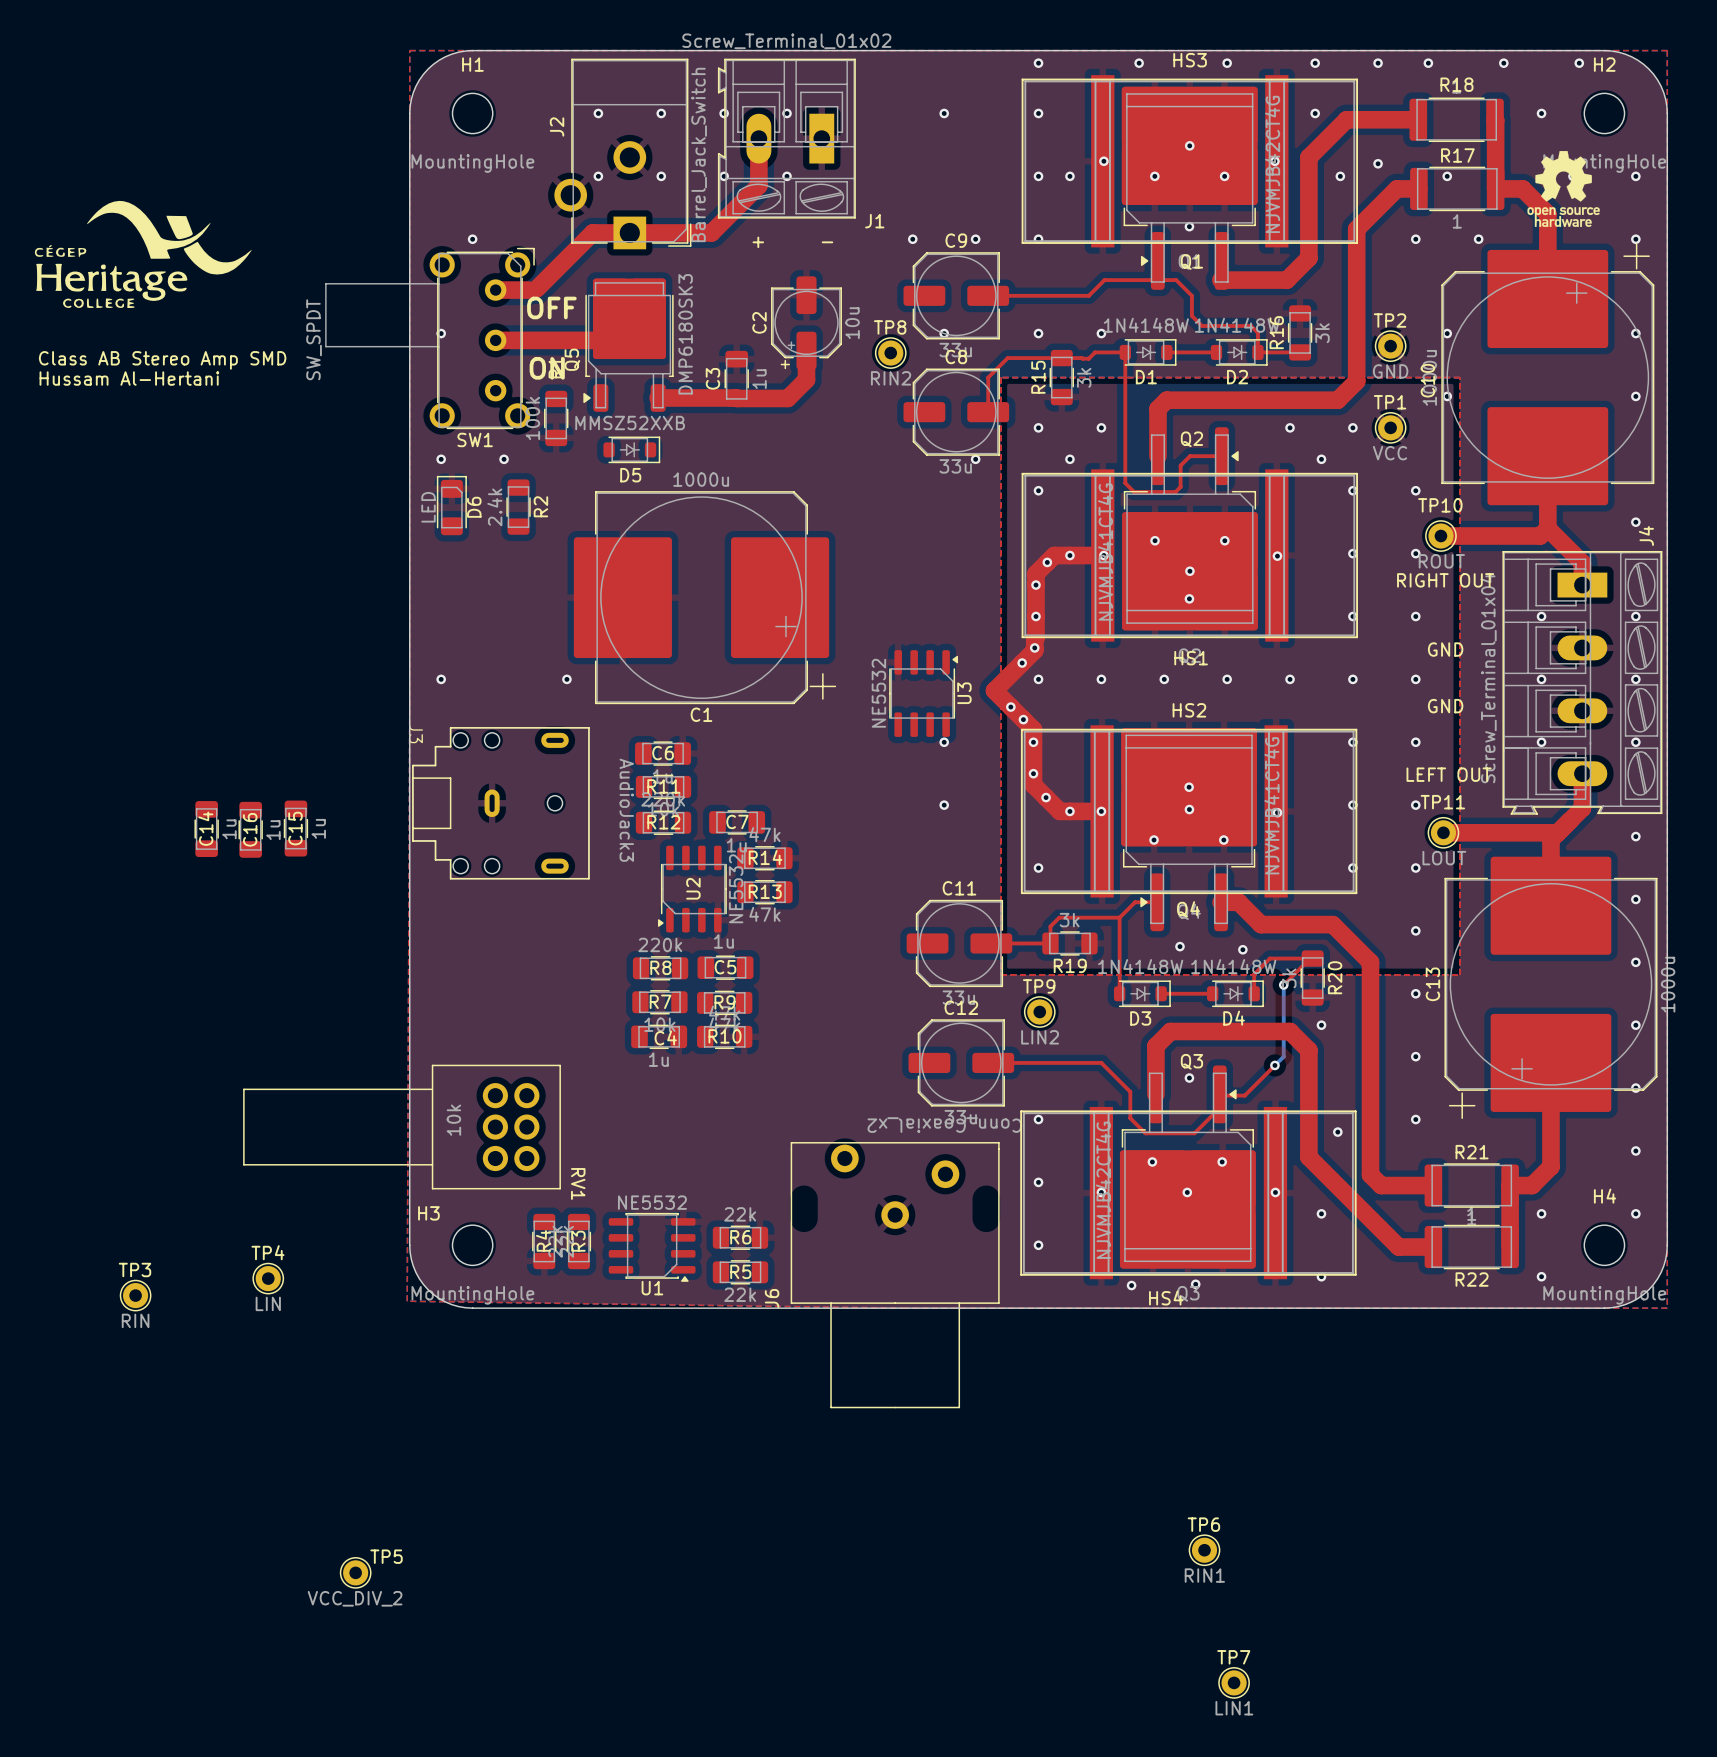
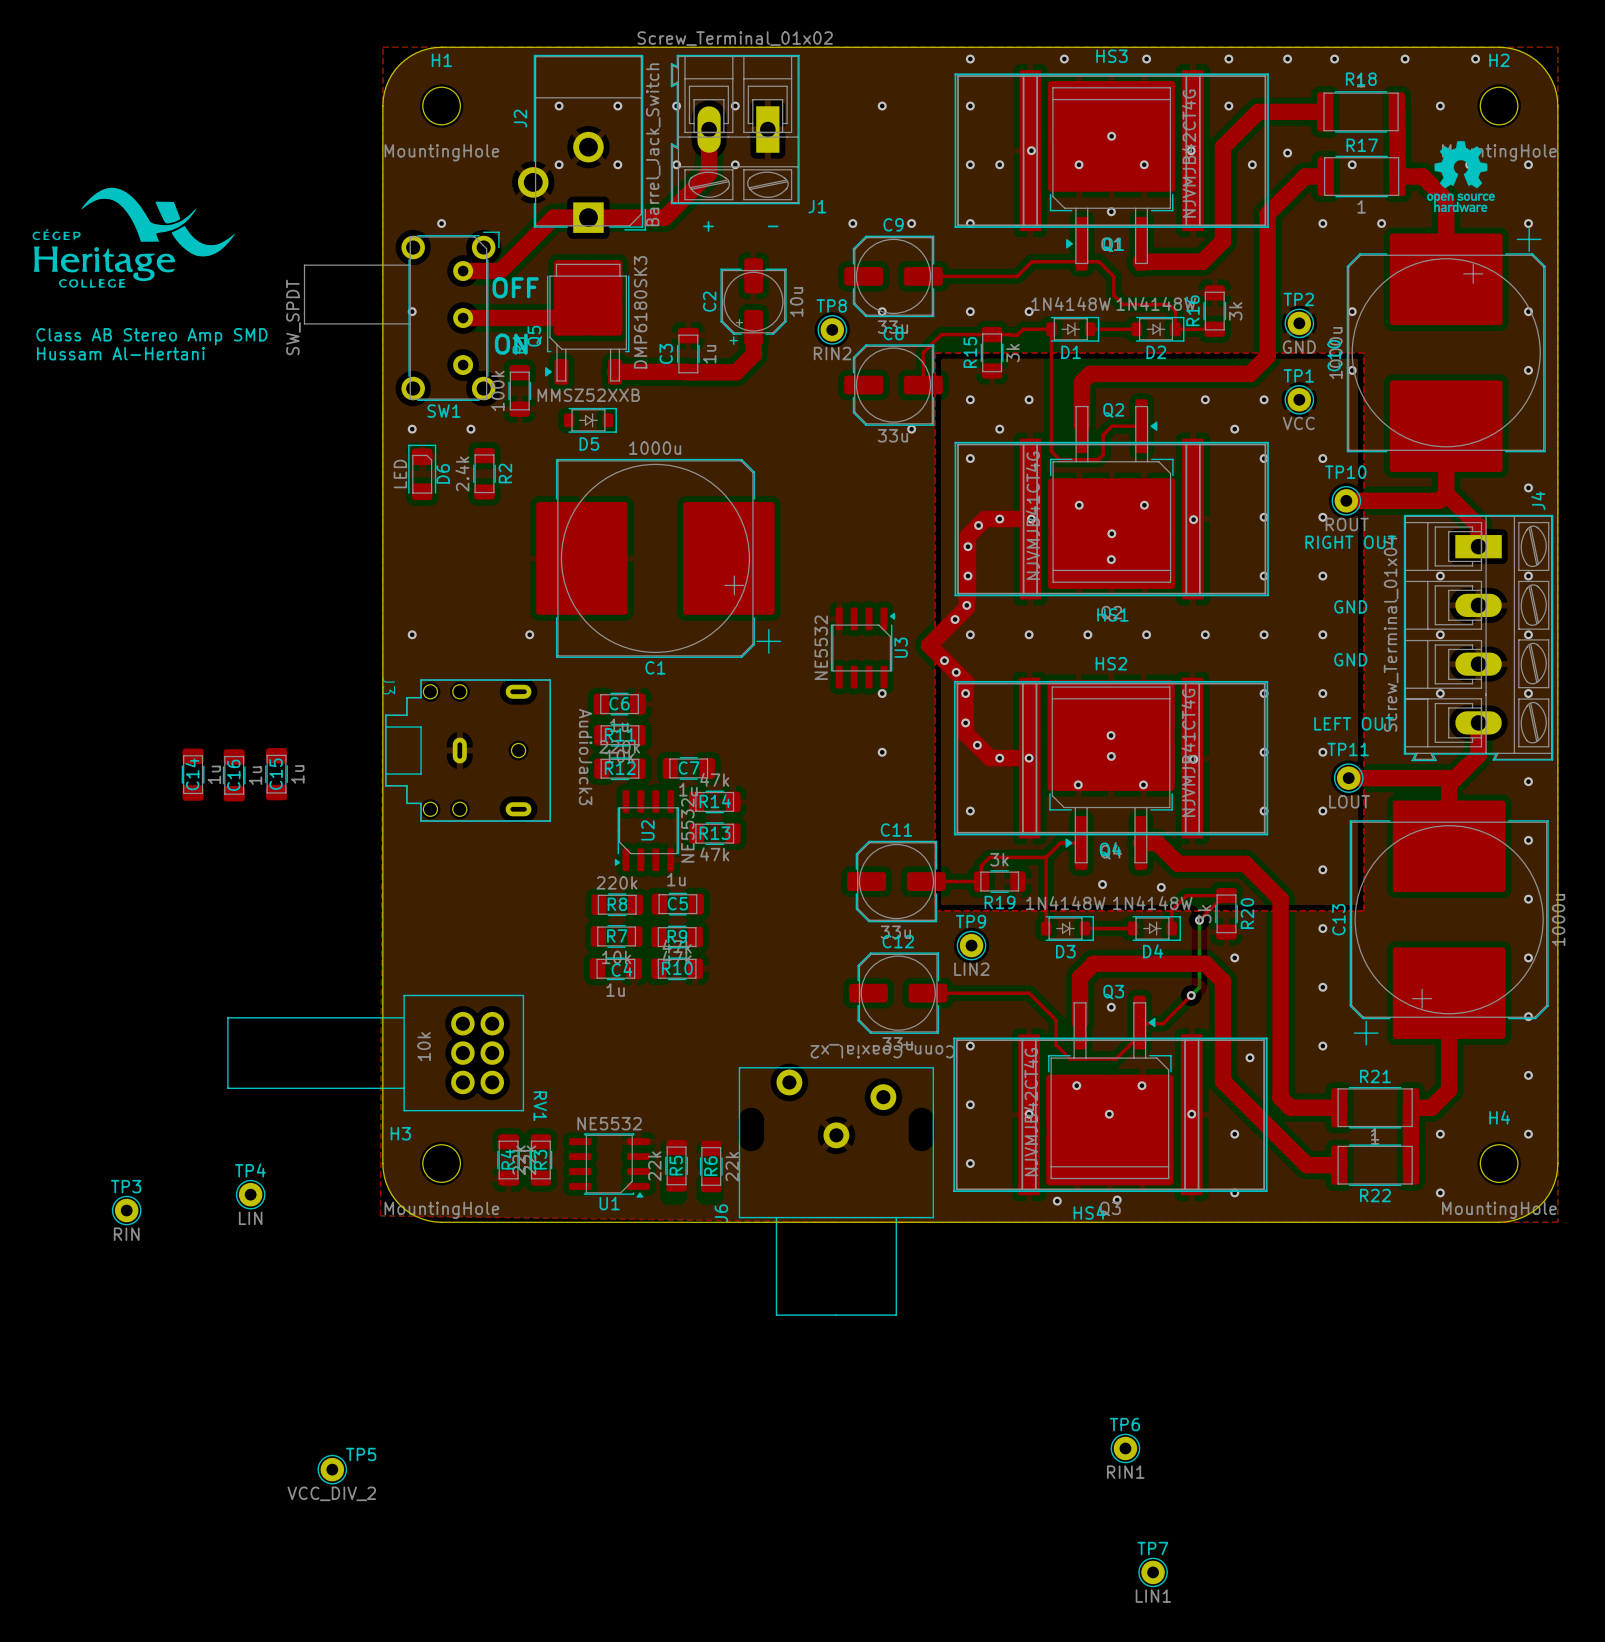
R6 rotation: 0° (740, 1237) -> 90° clockwise (711, 1166)
R5 rotation: 0° (740, 1272) -> 90° clockwise (676, 1165)

